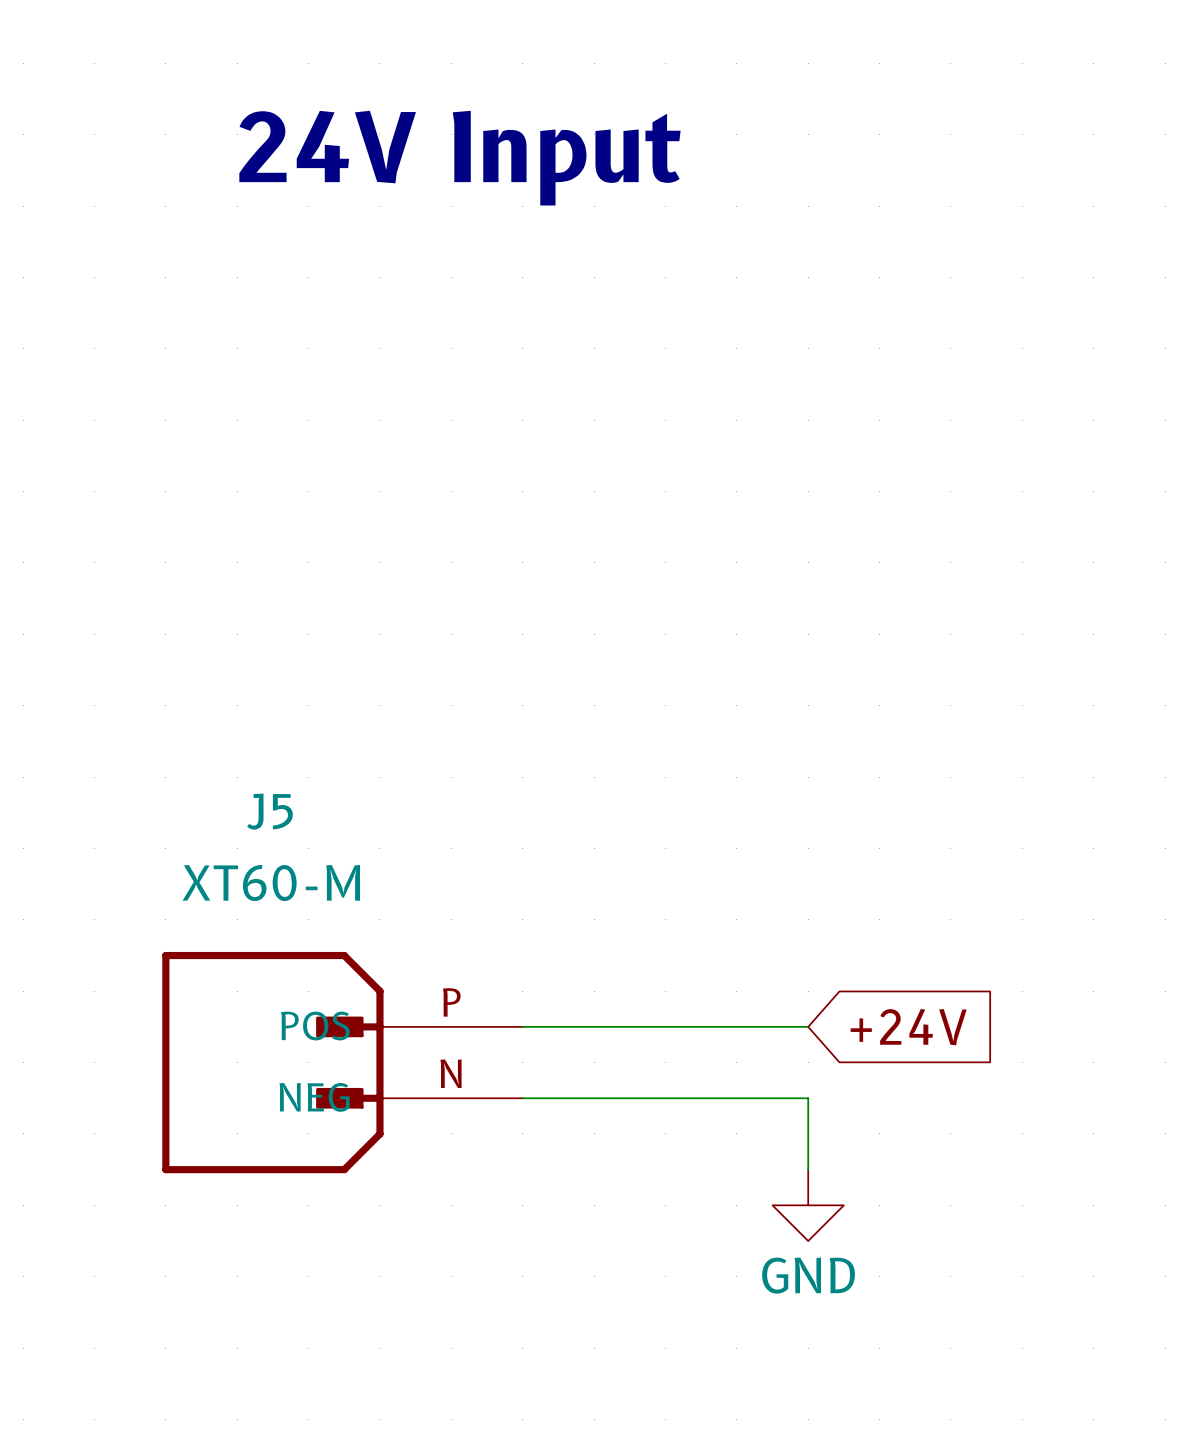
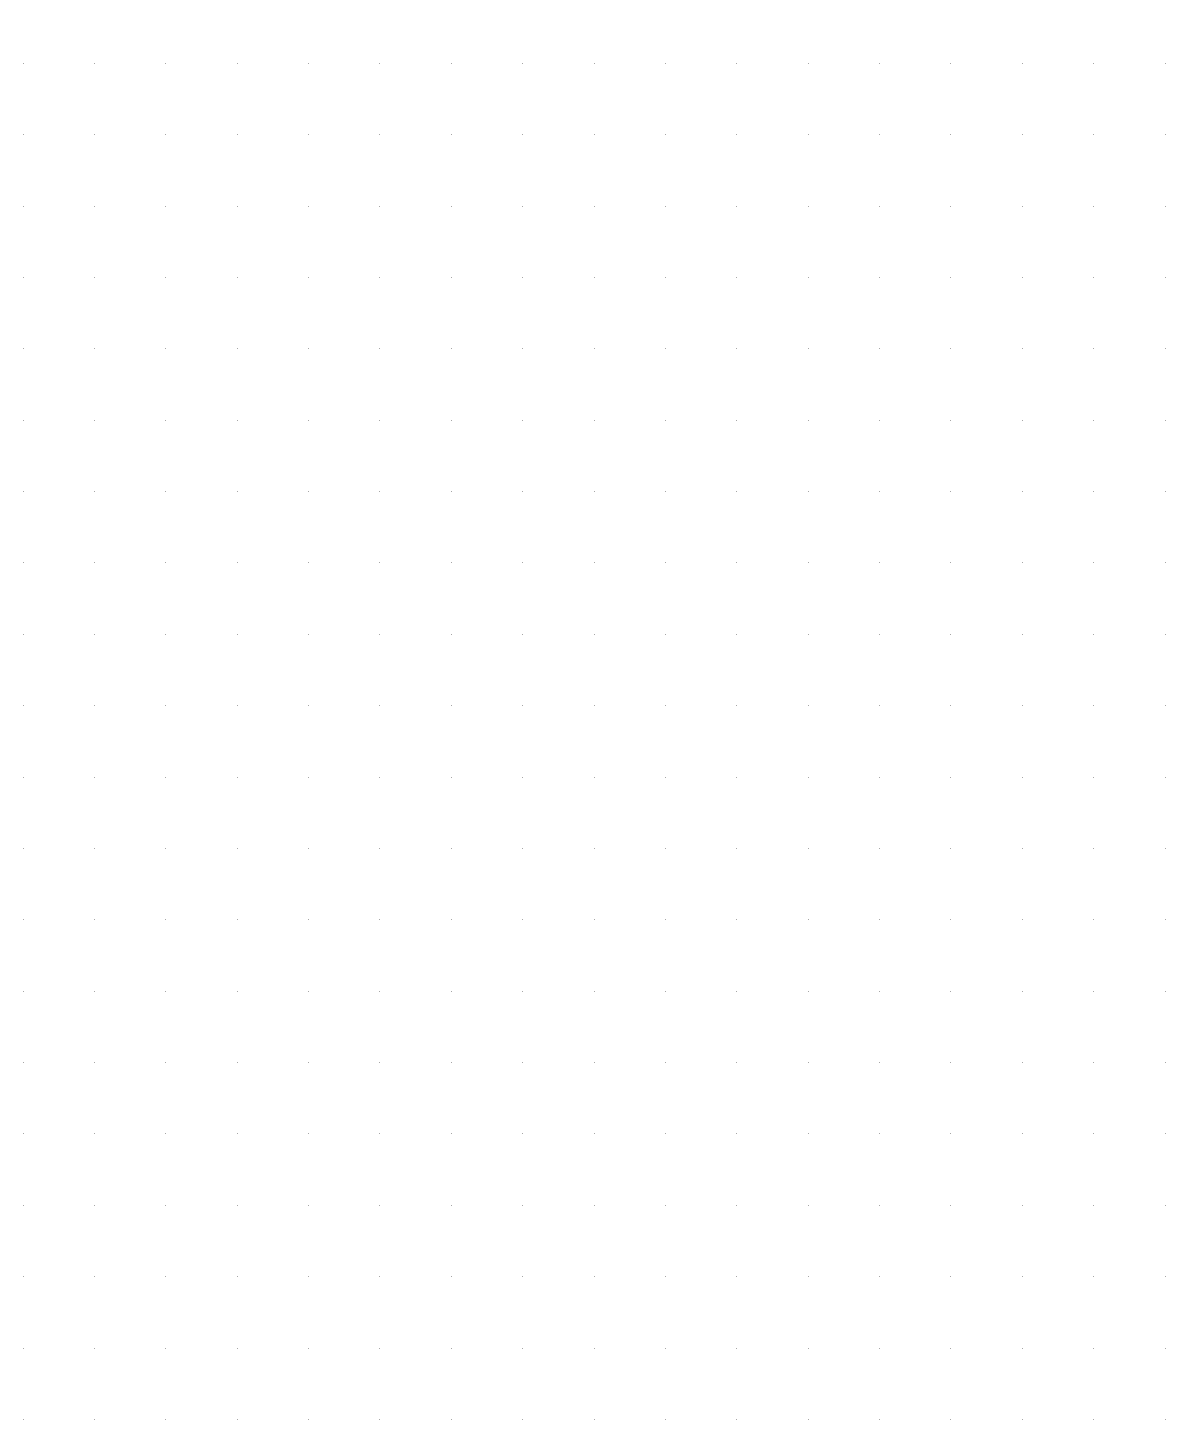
text: 24V Input (459, 158) -> none
wire: (522, 1026) (808, 1026) -> none
global label: +24V (908, 1027) -> none
J5: XT60-M (342, 1062) -> none
wire: (522, 1098) (808, 1098) (808, 1169) -> none
power symbol: GND (808, 1205) -> none

